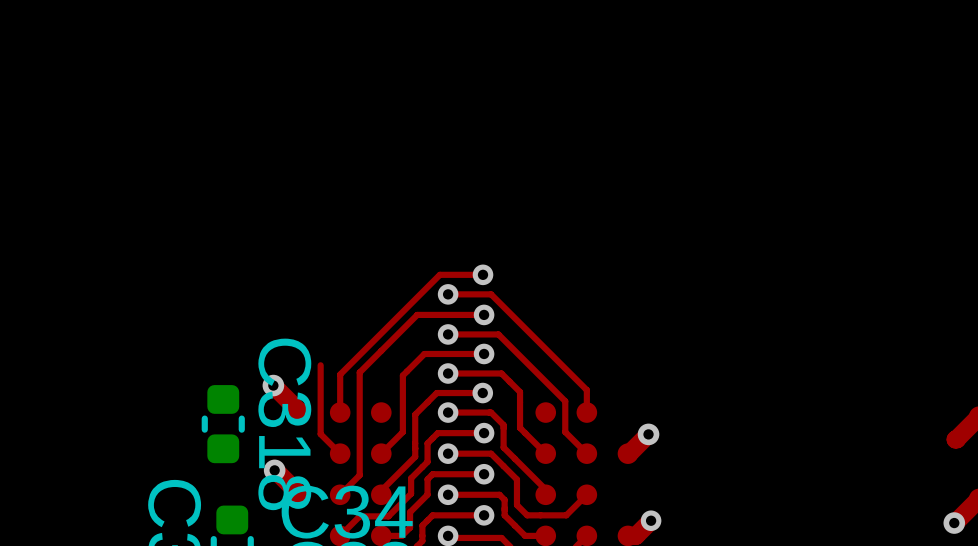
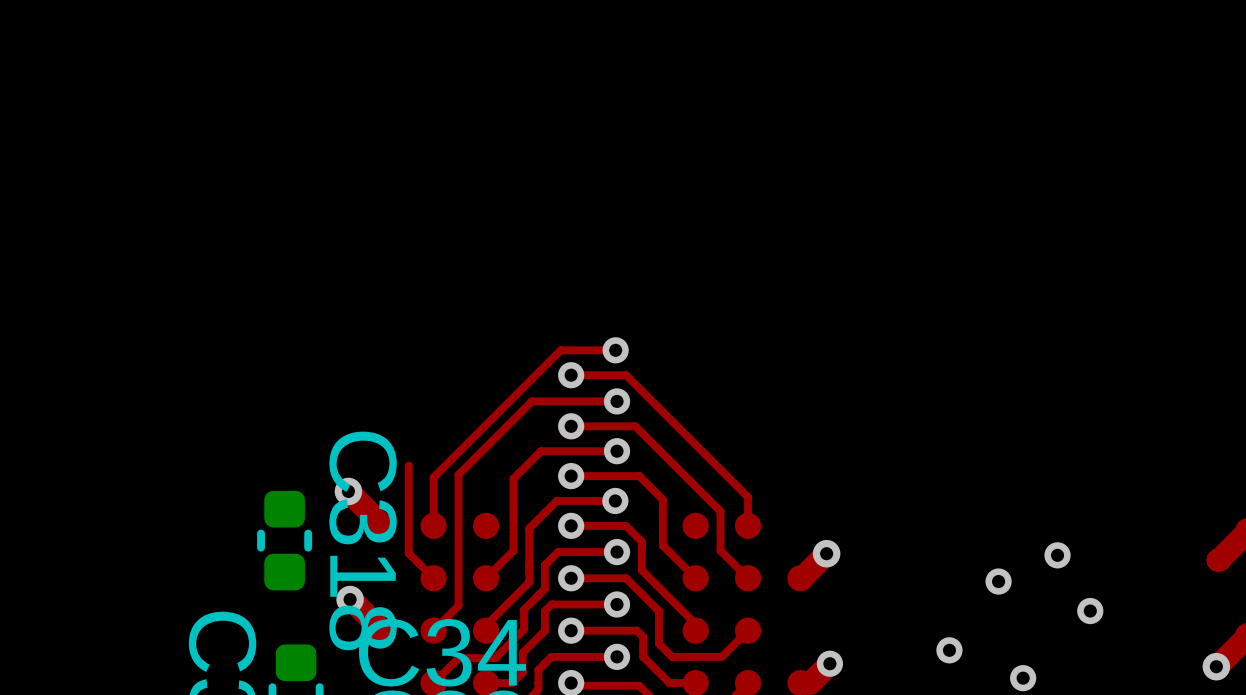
via: none -> (1057, 555)
via: none -> (998, 581)
via: none -> (1090, 611)
via: none -> (949, 650)
via: none -> (1023, 678)

